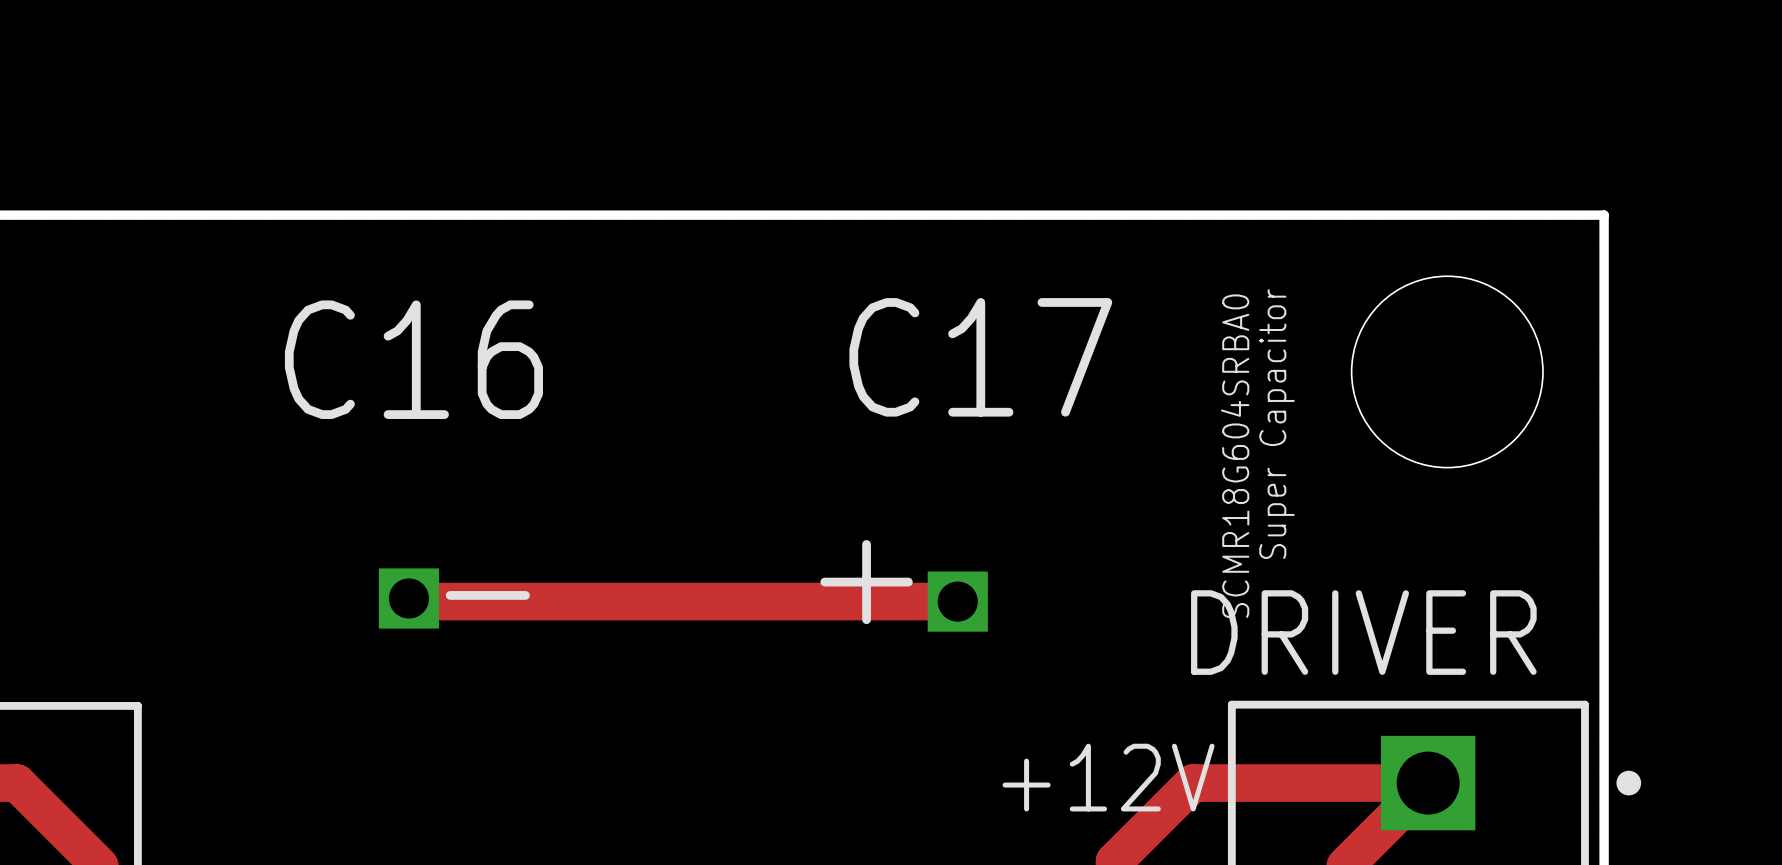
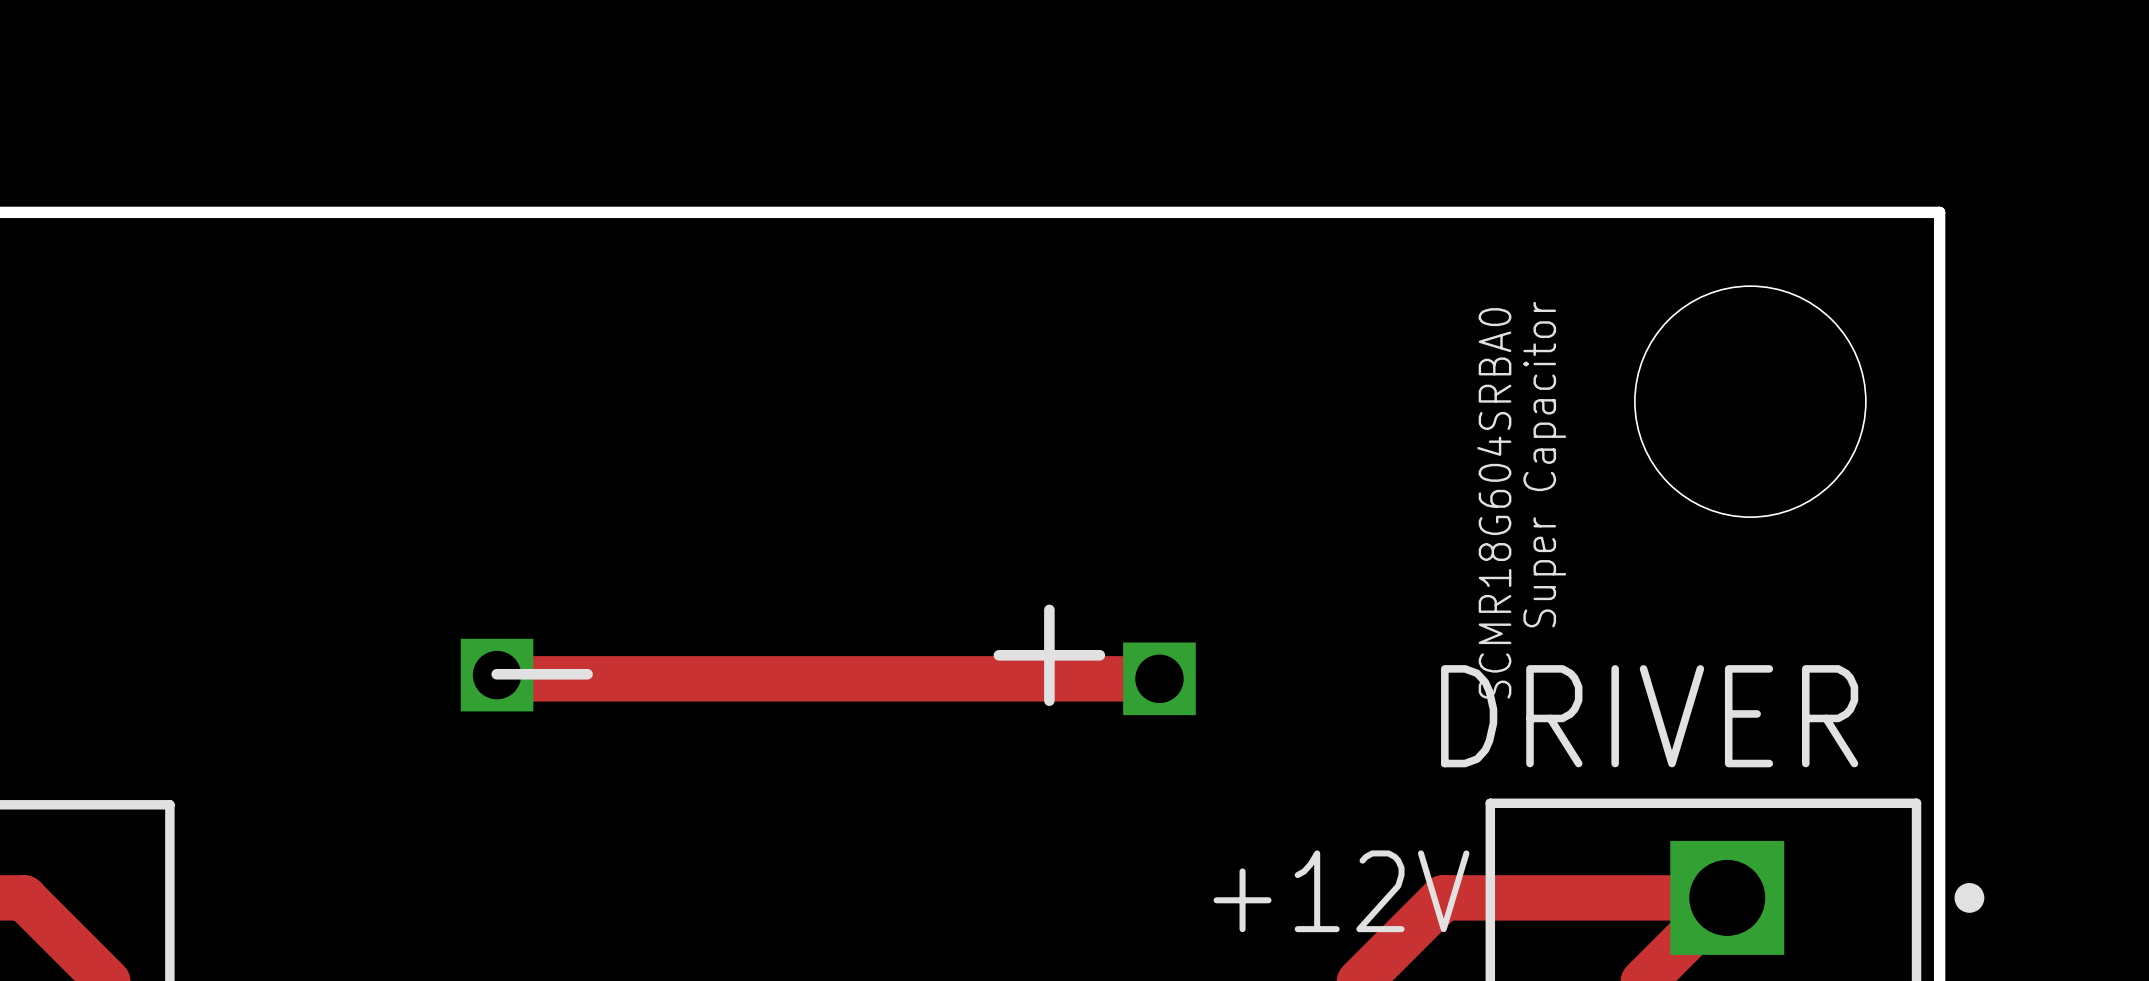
text: C17 (980, 357) -> none
text: C16 (413, 359) -> none
text position: - (487, 595) -> - (542, 674)

